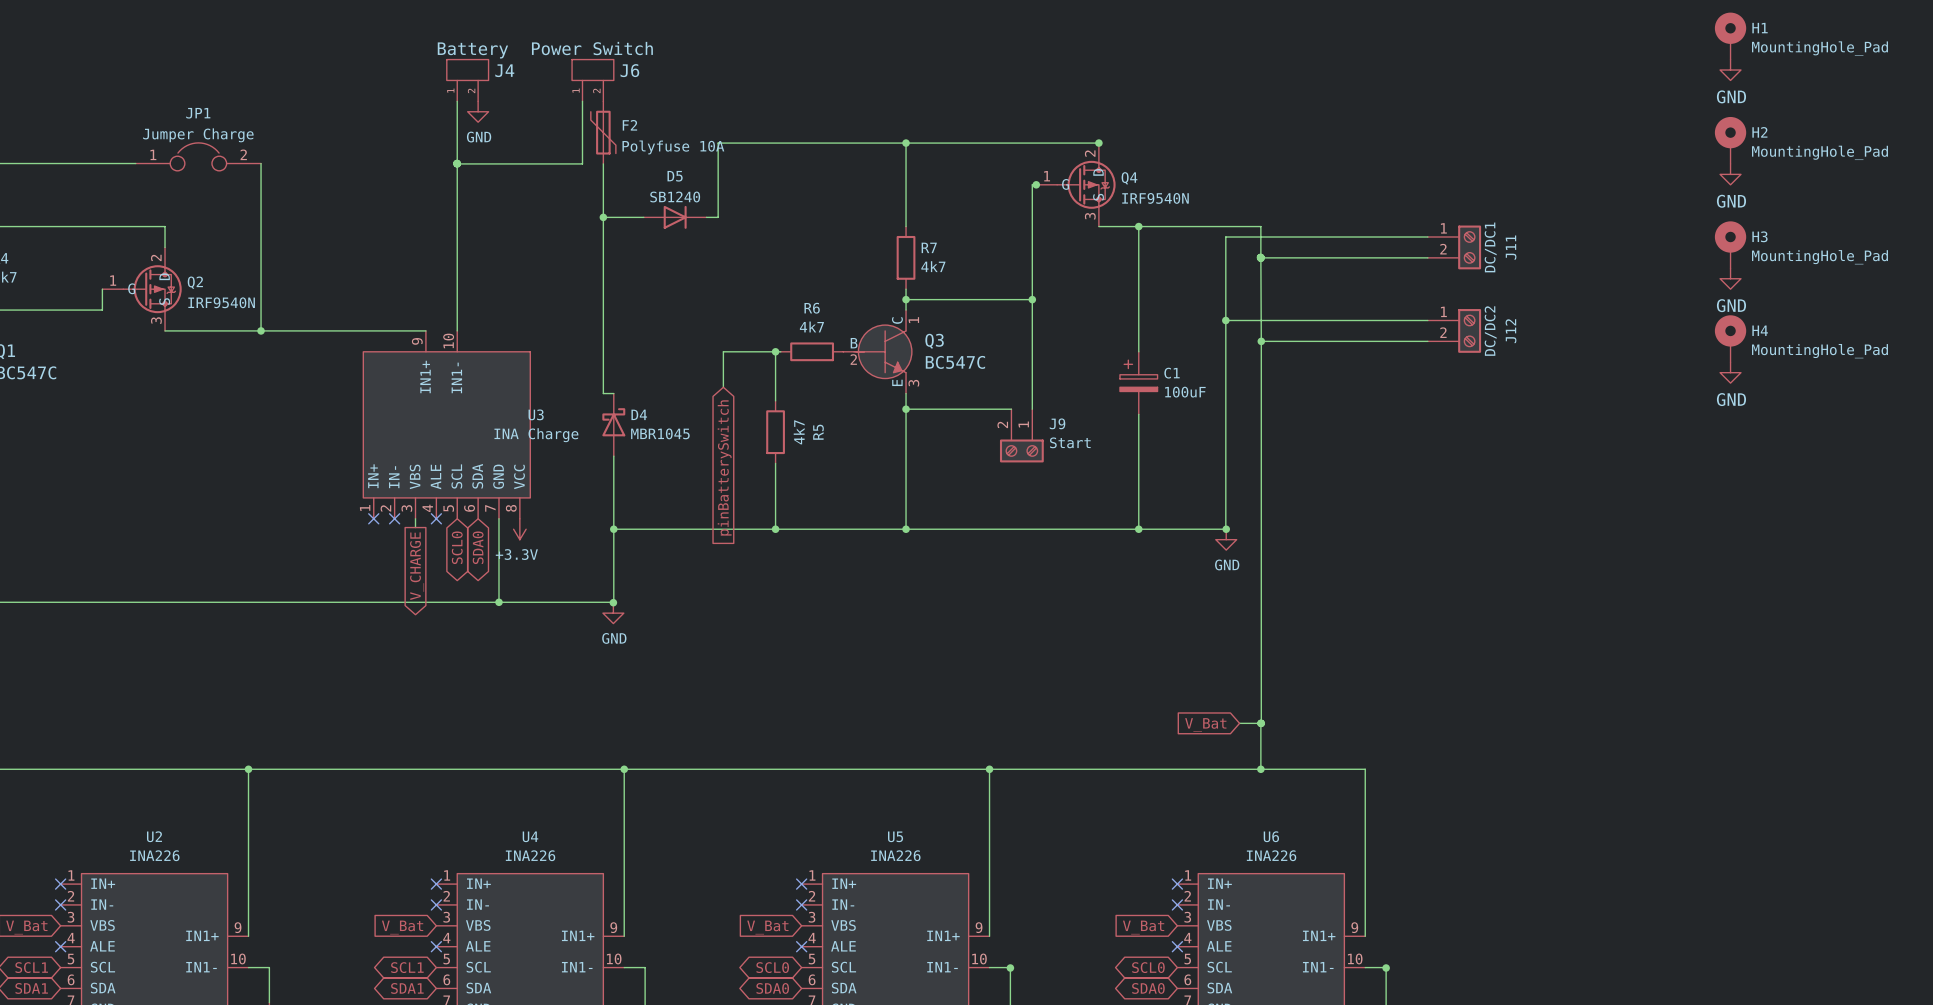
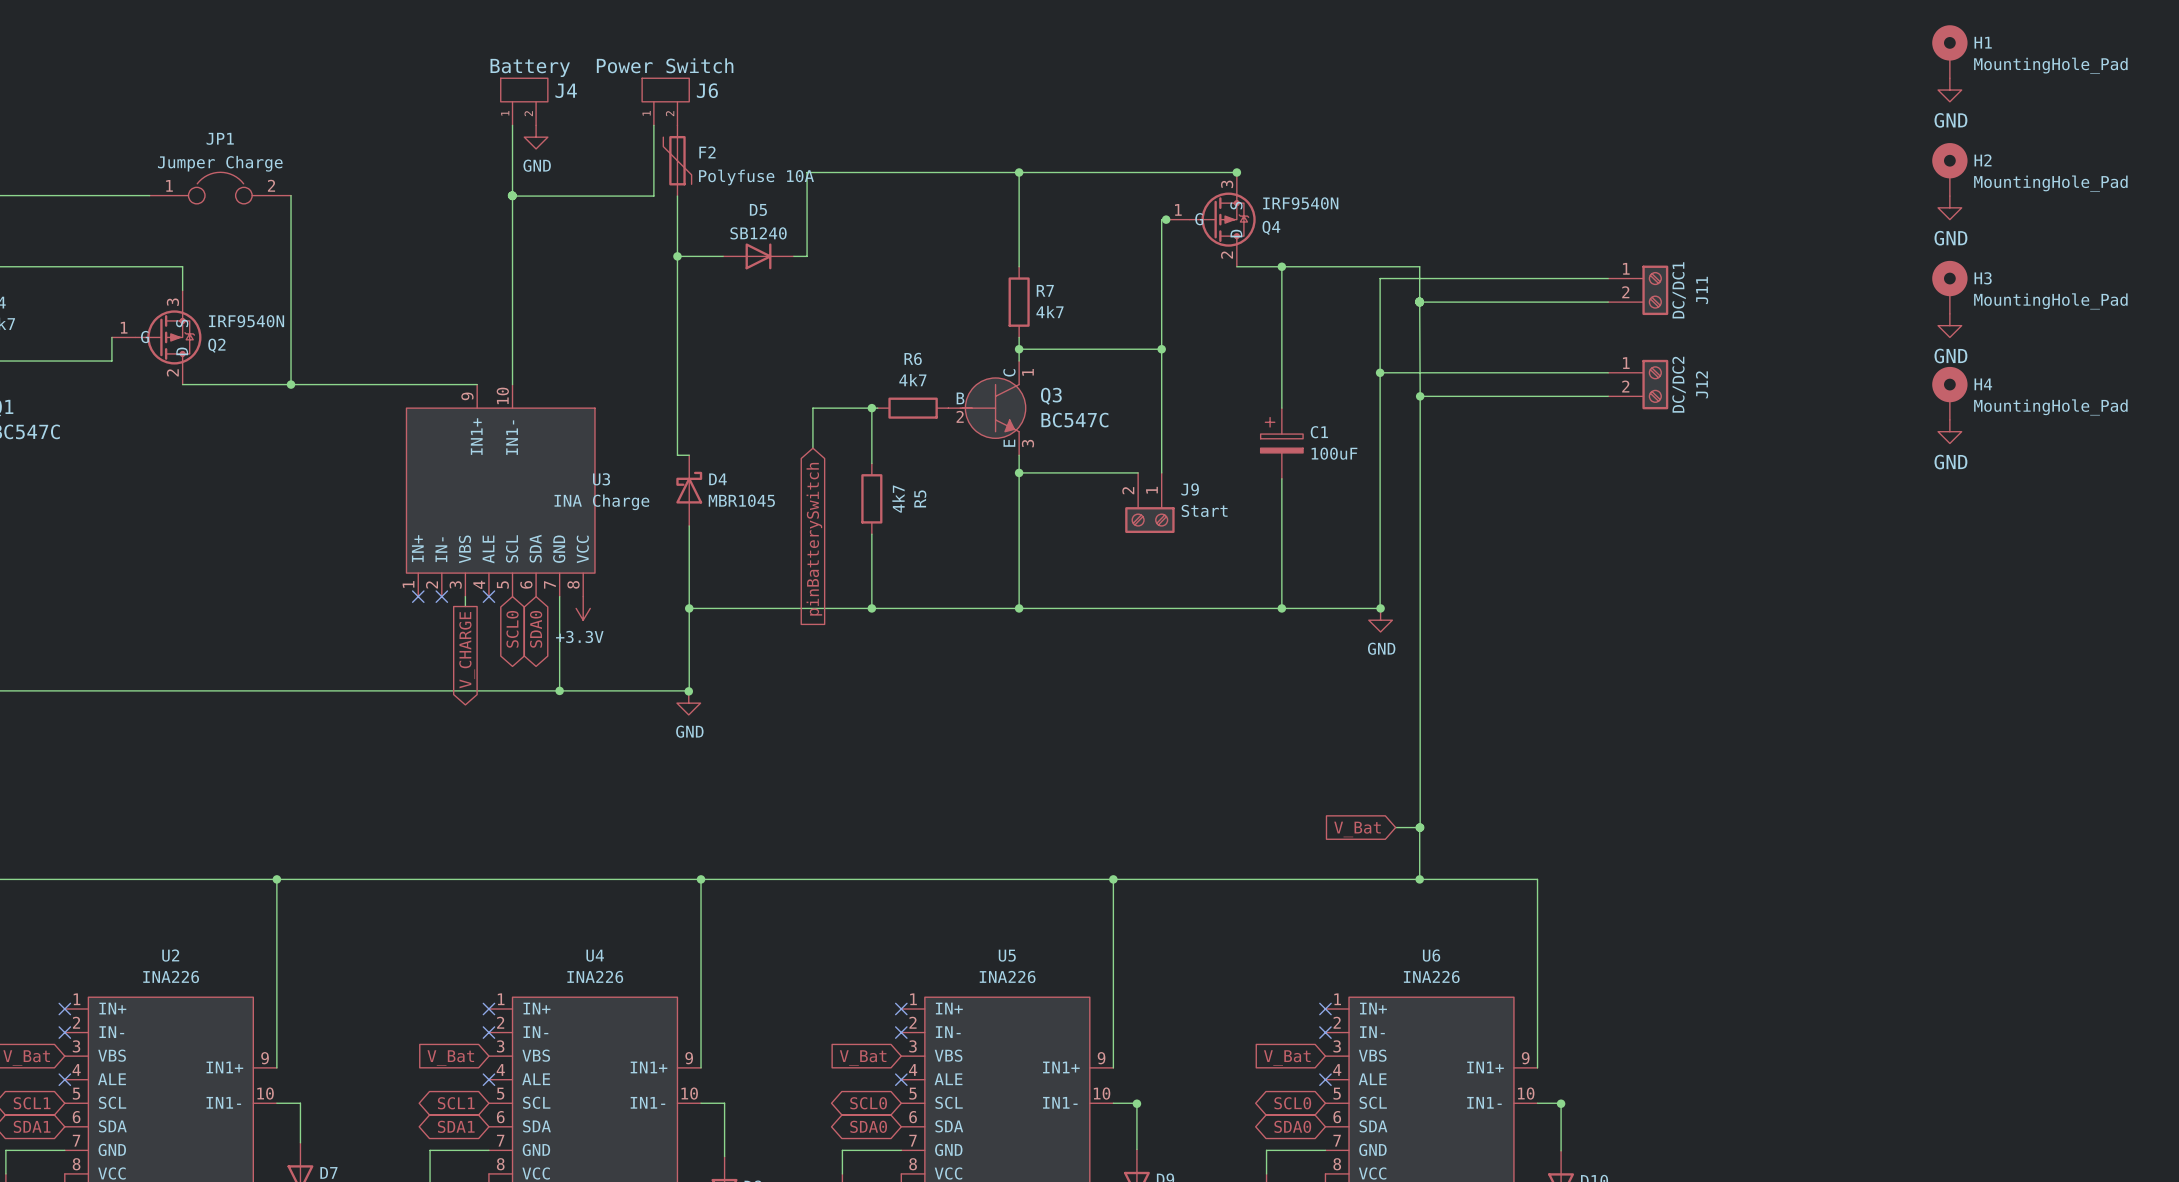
Q4 flip: as is (1086, 184) -> up-down (1222, 219)
Q2 flip: as is (152, 289) -> up-down (168, 337)

